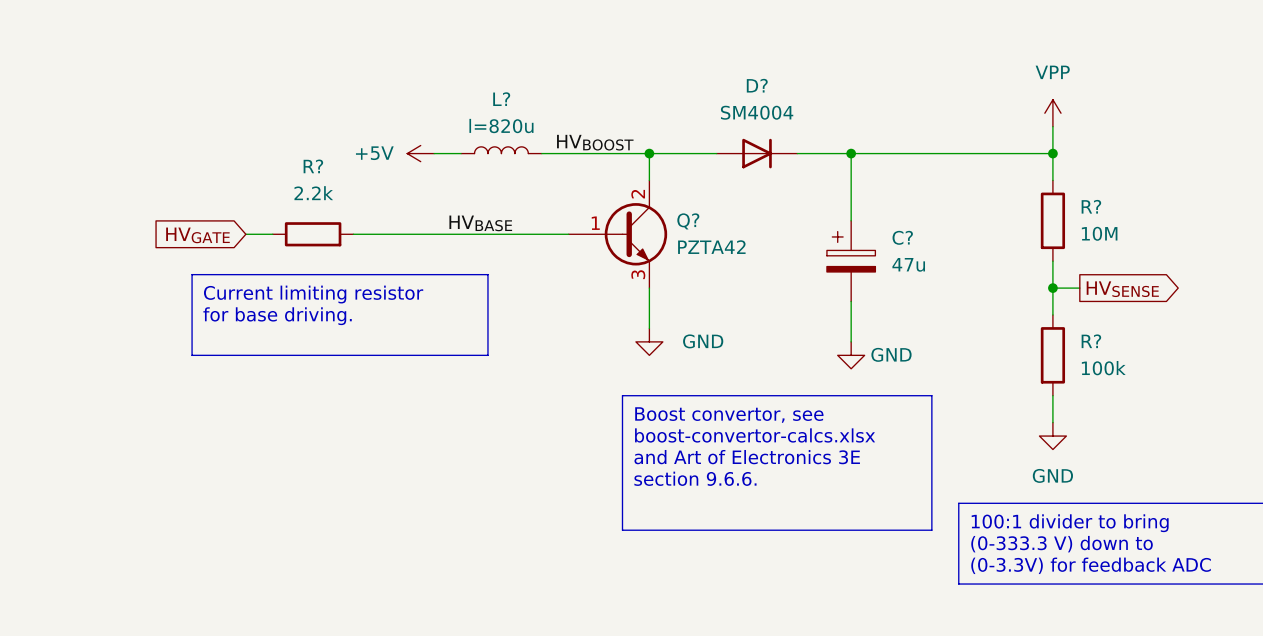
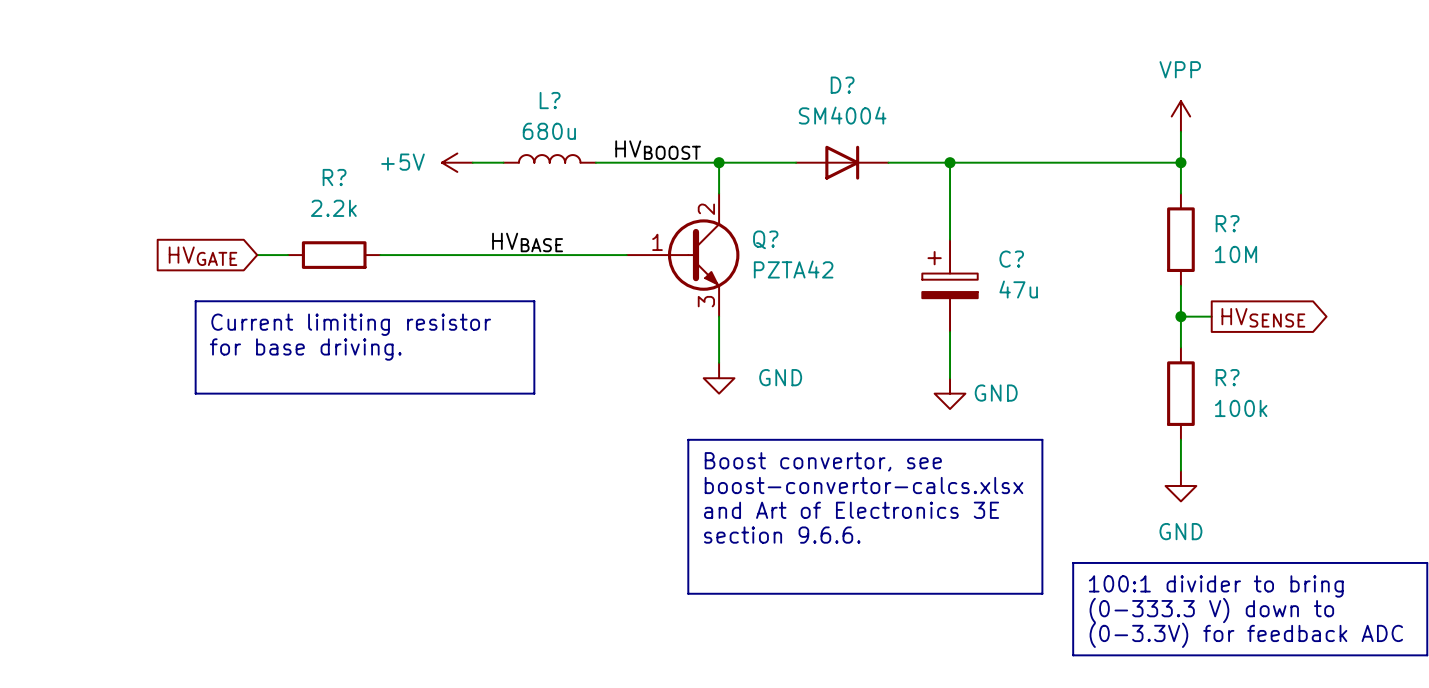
L? value: l=820u (501, 126) -> 680u (549, 131)

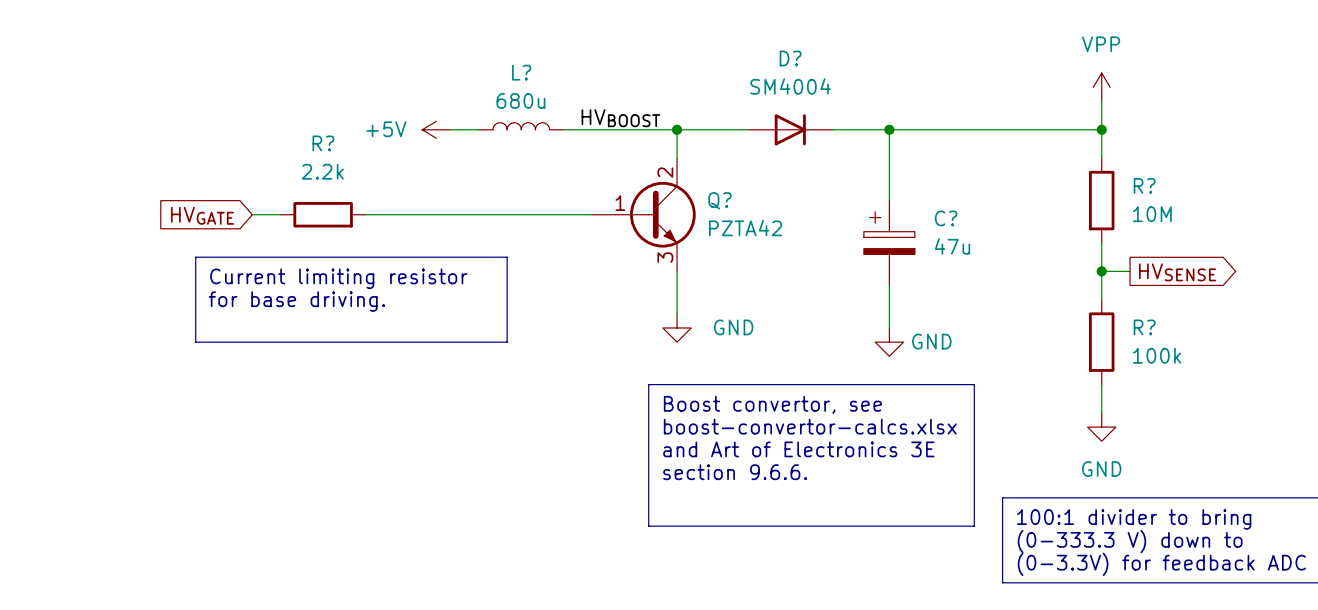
label: HVBASE (527, 242) -> none

